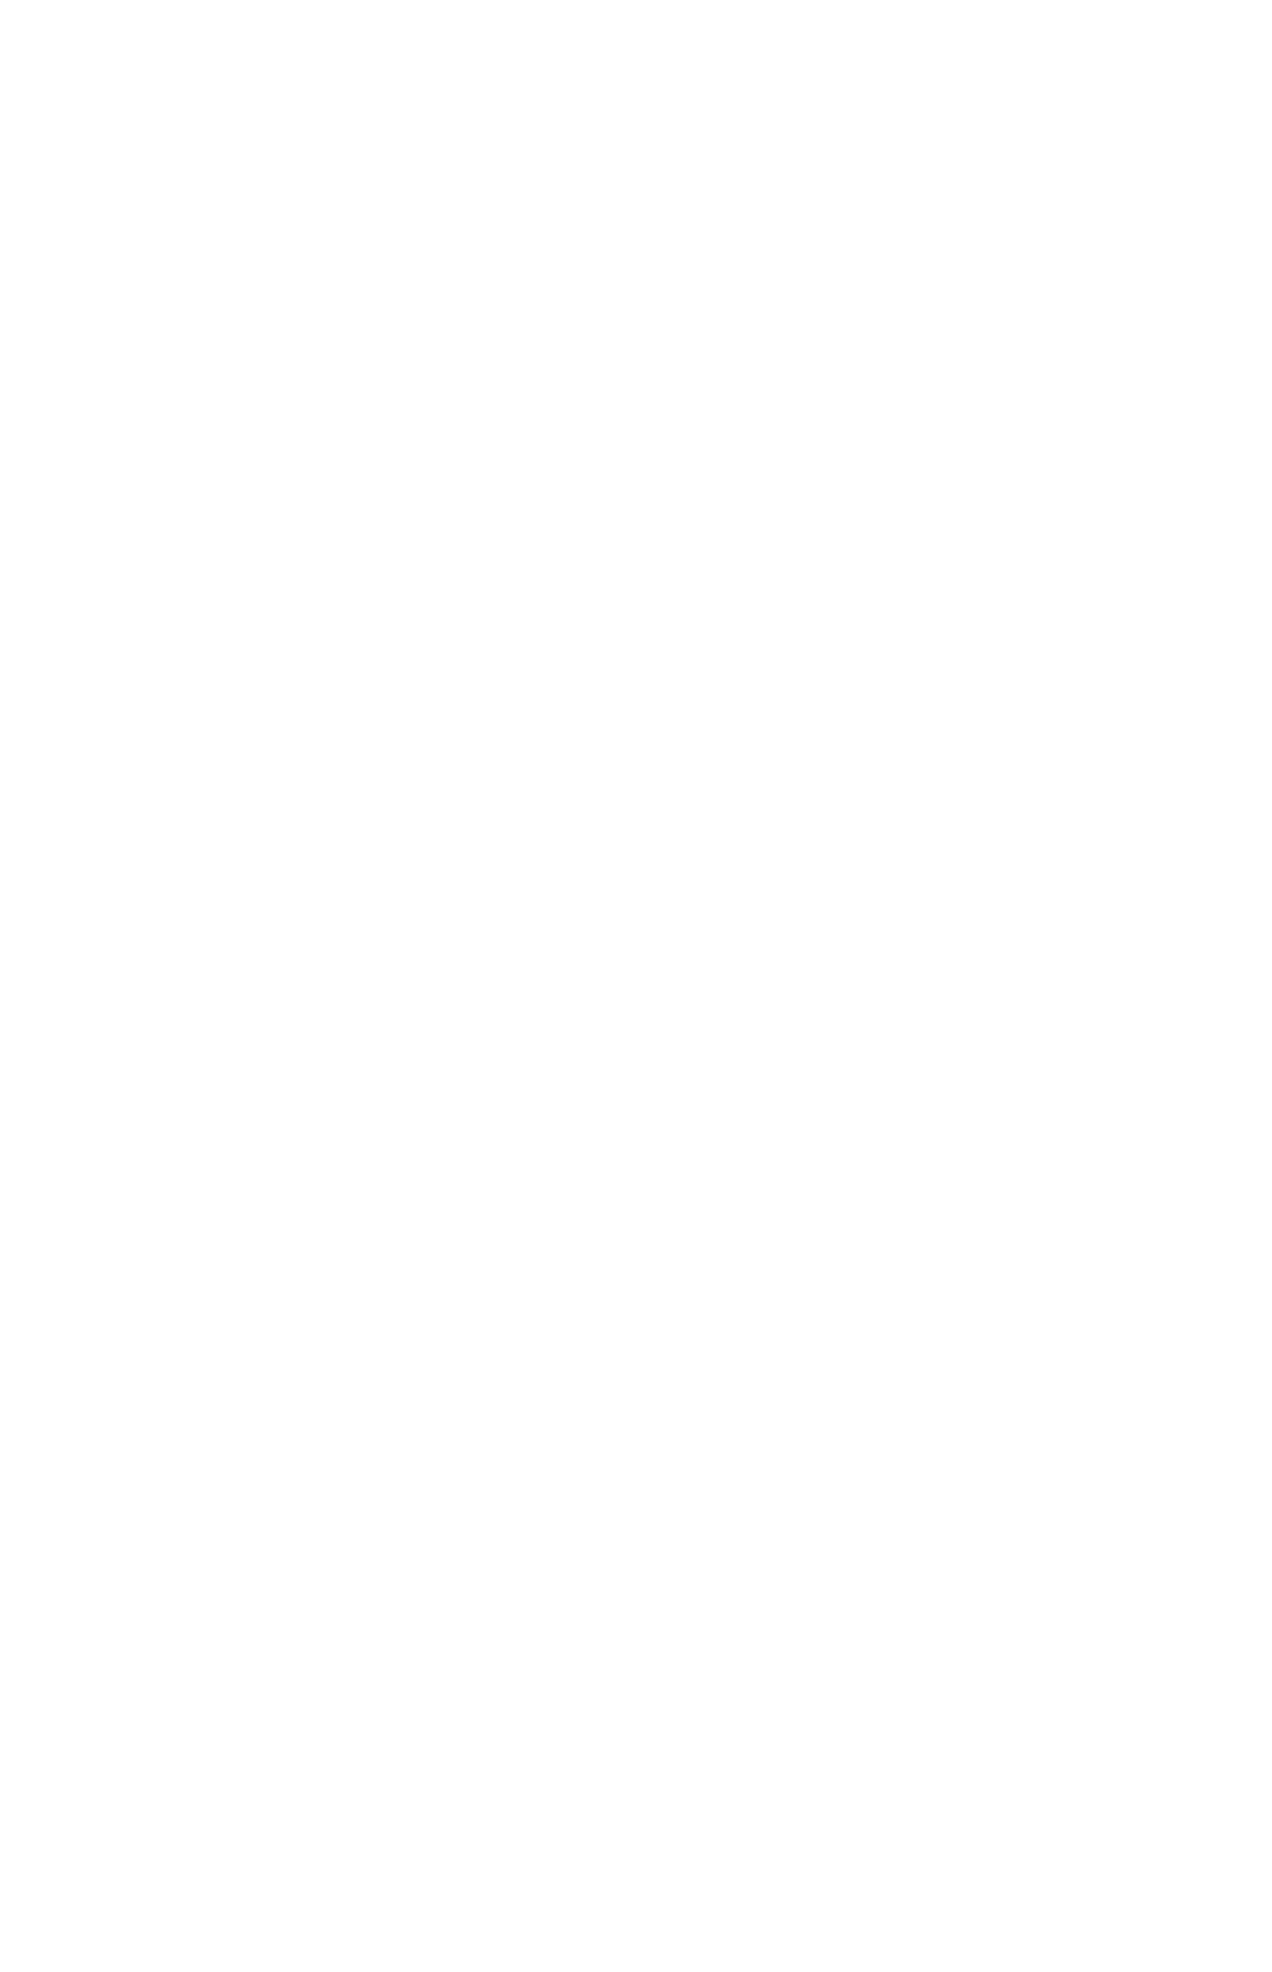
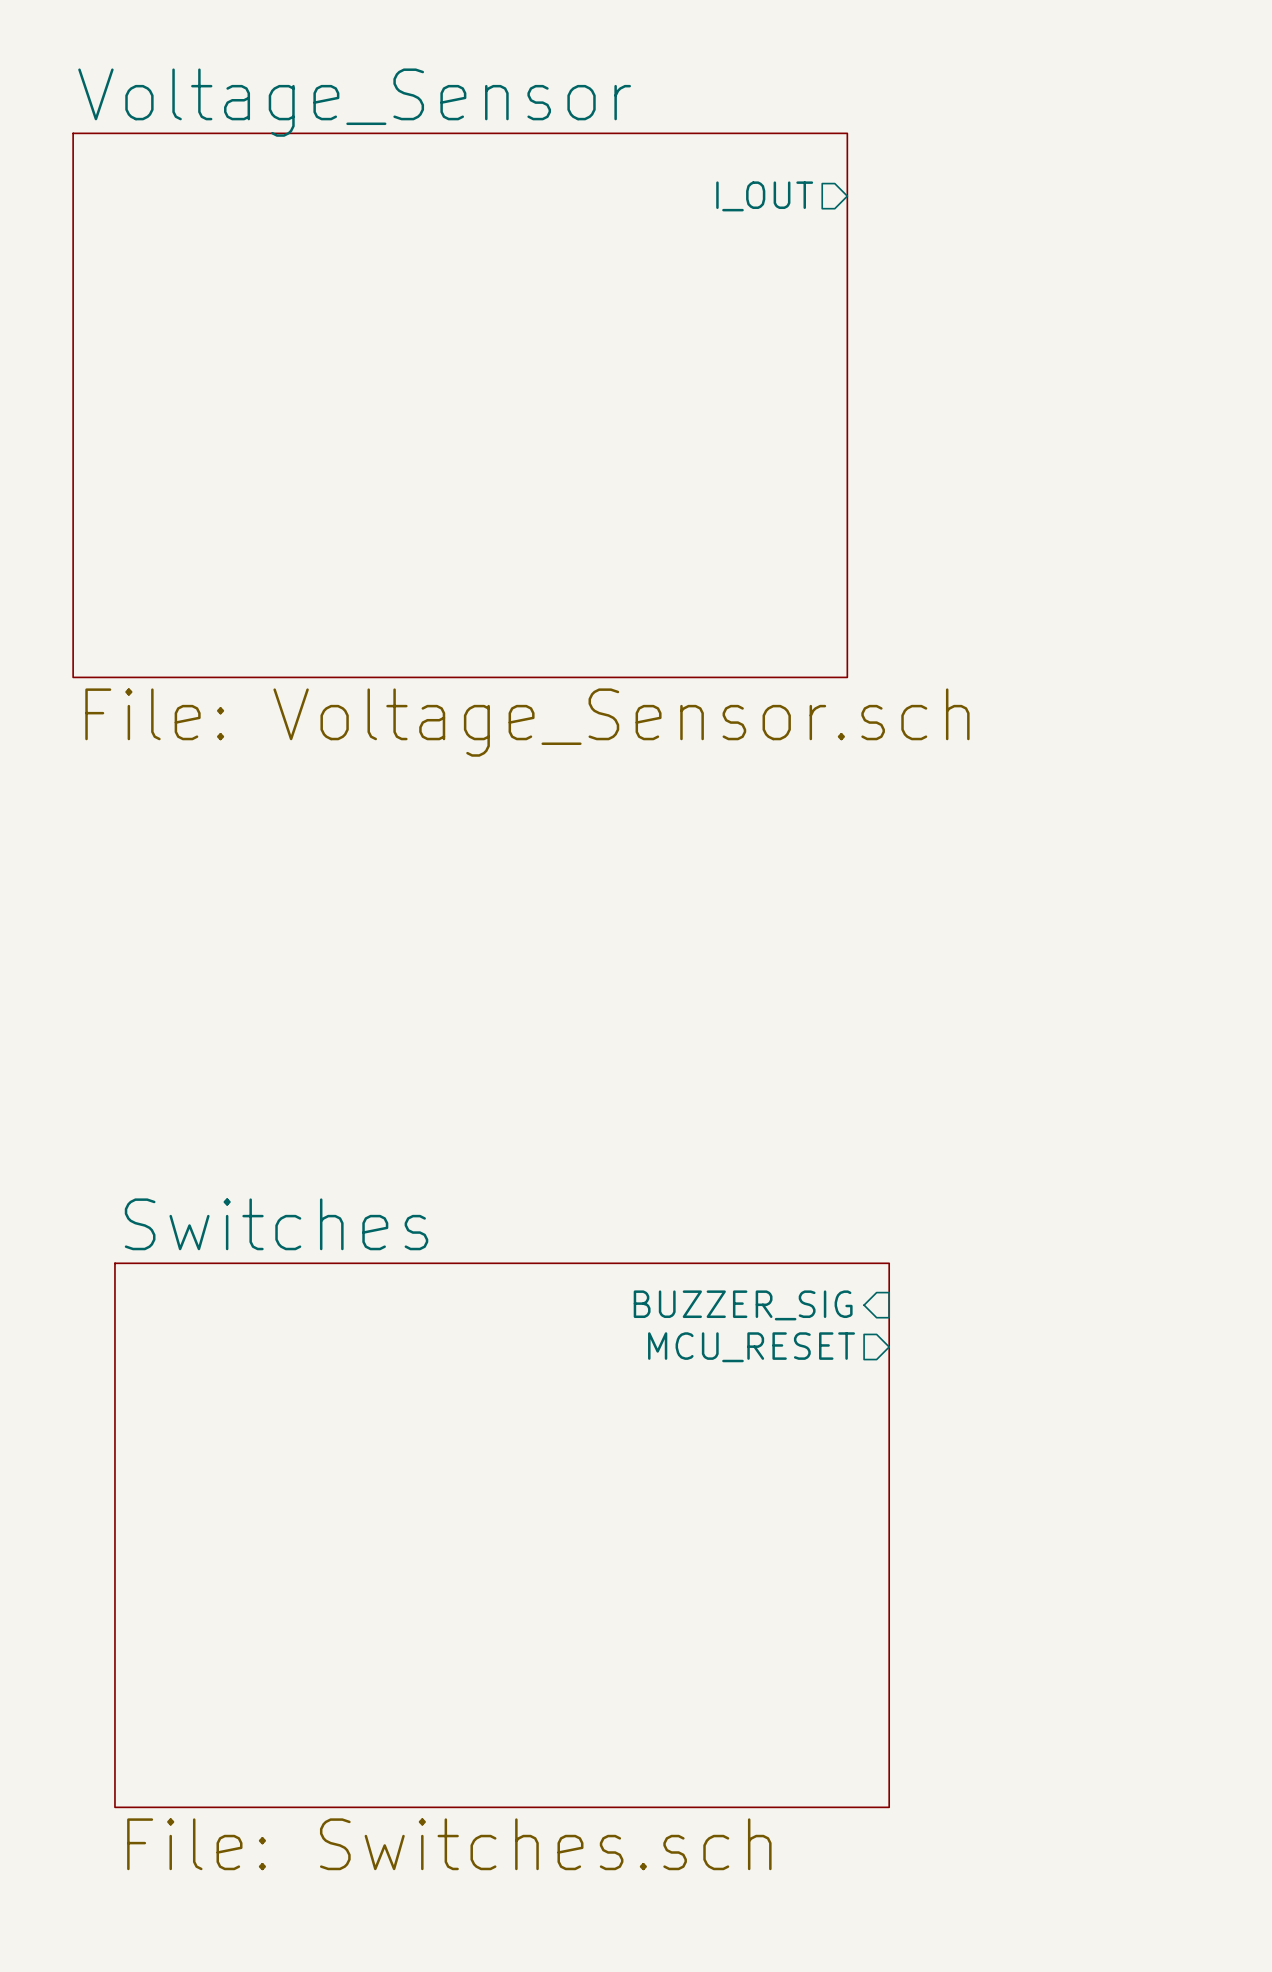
sheet pin: none -> I_OUT (764, 196)
sheet Voltage_Sensor: none -> File: Voltage_Sensor.sch (460, 405)
sheet pin: none -> BUZZER_SIG (743, 1305)
sheet pin: none -> MCU_RESET (751, 1347)
sheet Switches: none -> File: Switches.sch (502, 1535)

